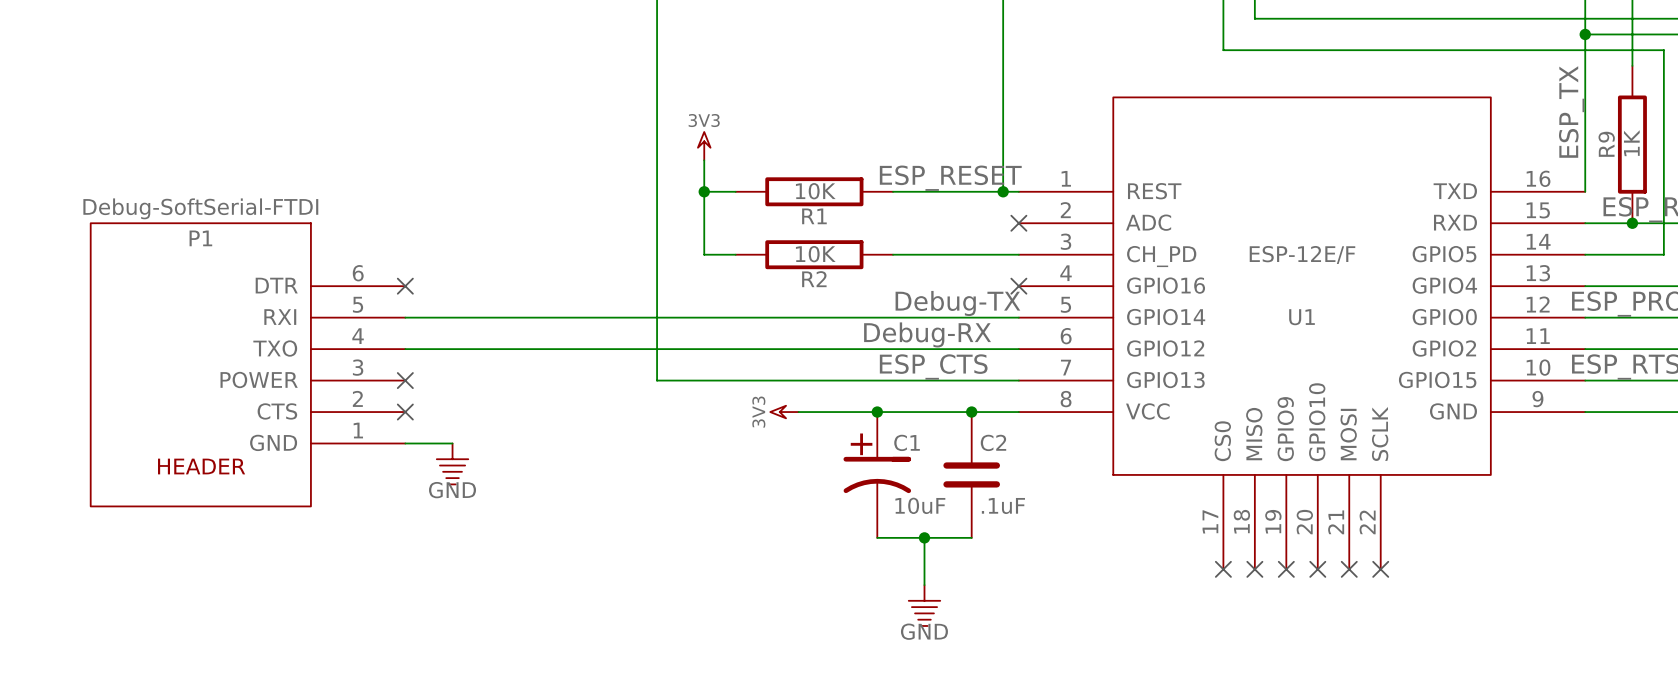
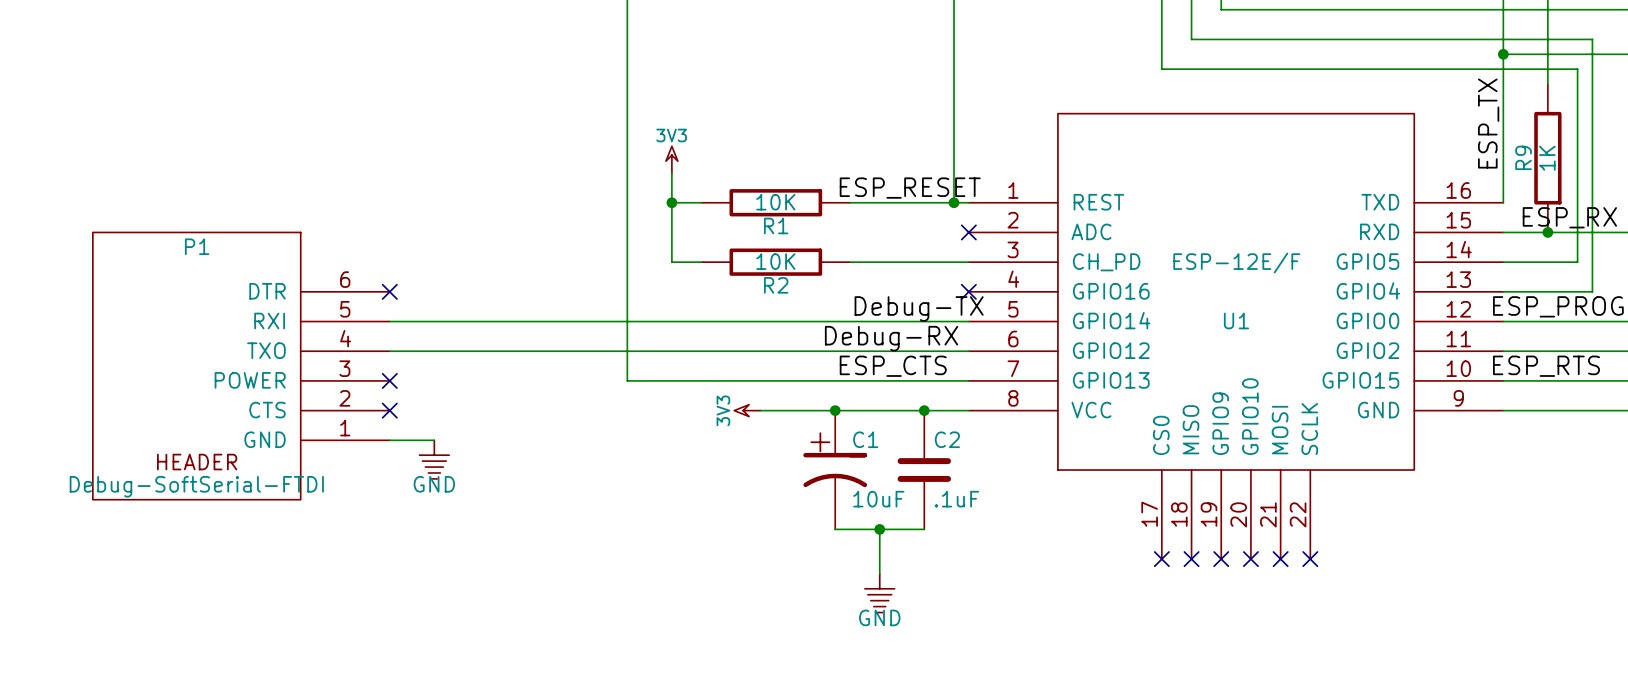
P1 value position: Debug-SoftSerial-FTDI (200, 208) -> Debug-SoftSerial-FTDI (196, 486)

